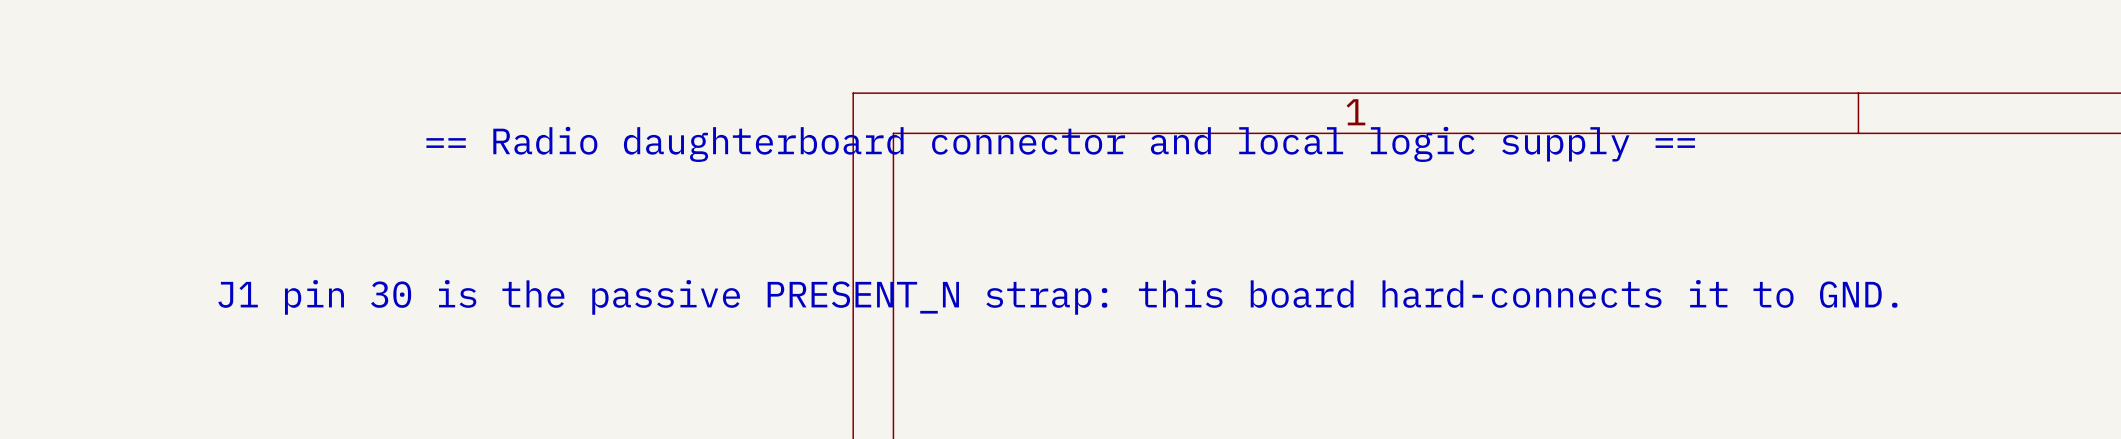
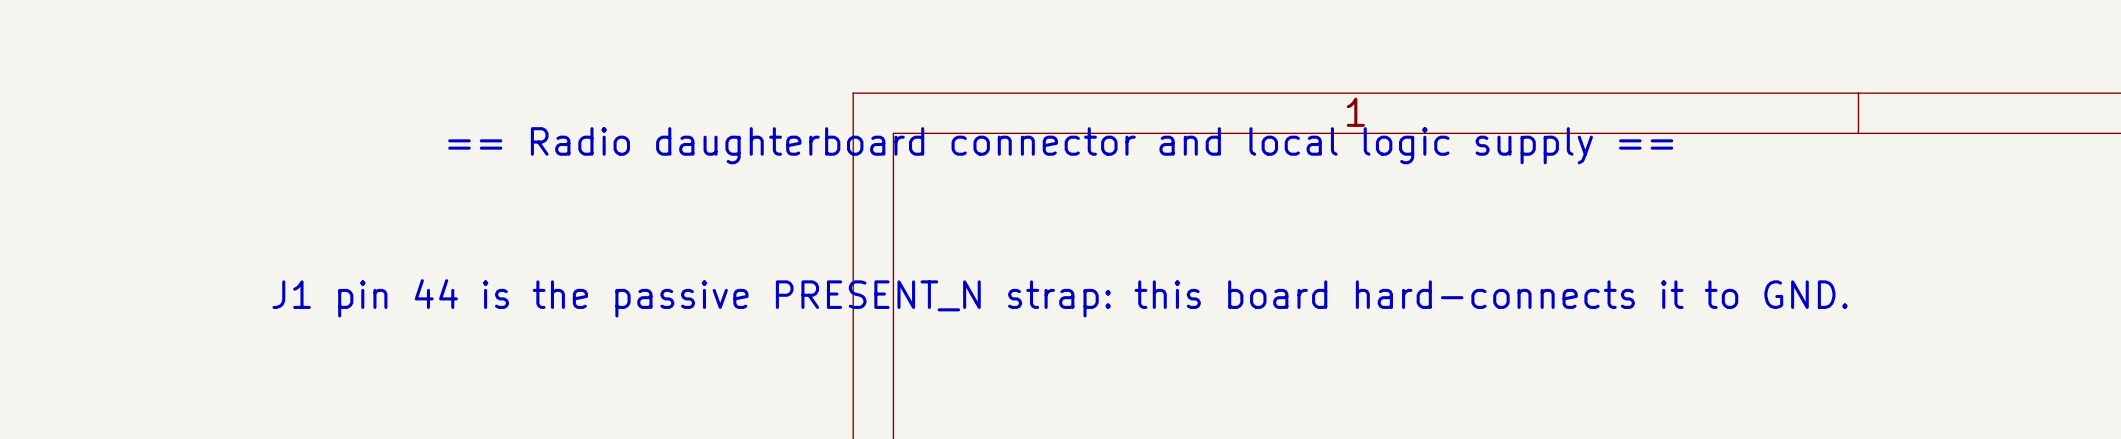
text: J1 pin 30 is the passive PRESENT_N strap: this board hard-connects it to GND. (1057, 297) -> J1 pin 44 is the passive PRESENT_N strap: this board hard-connects it to GND. (1060, 298)

